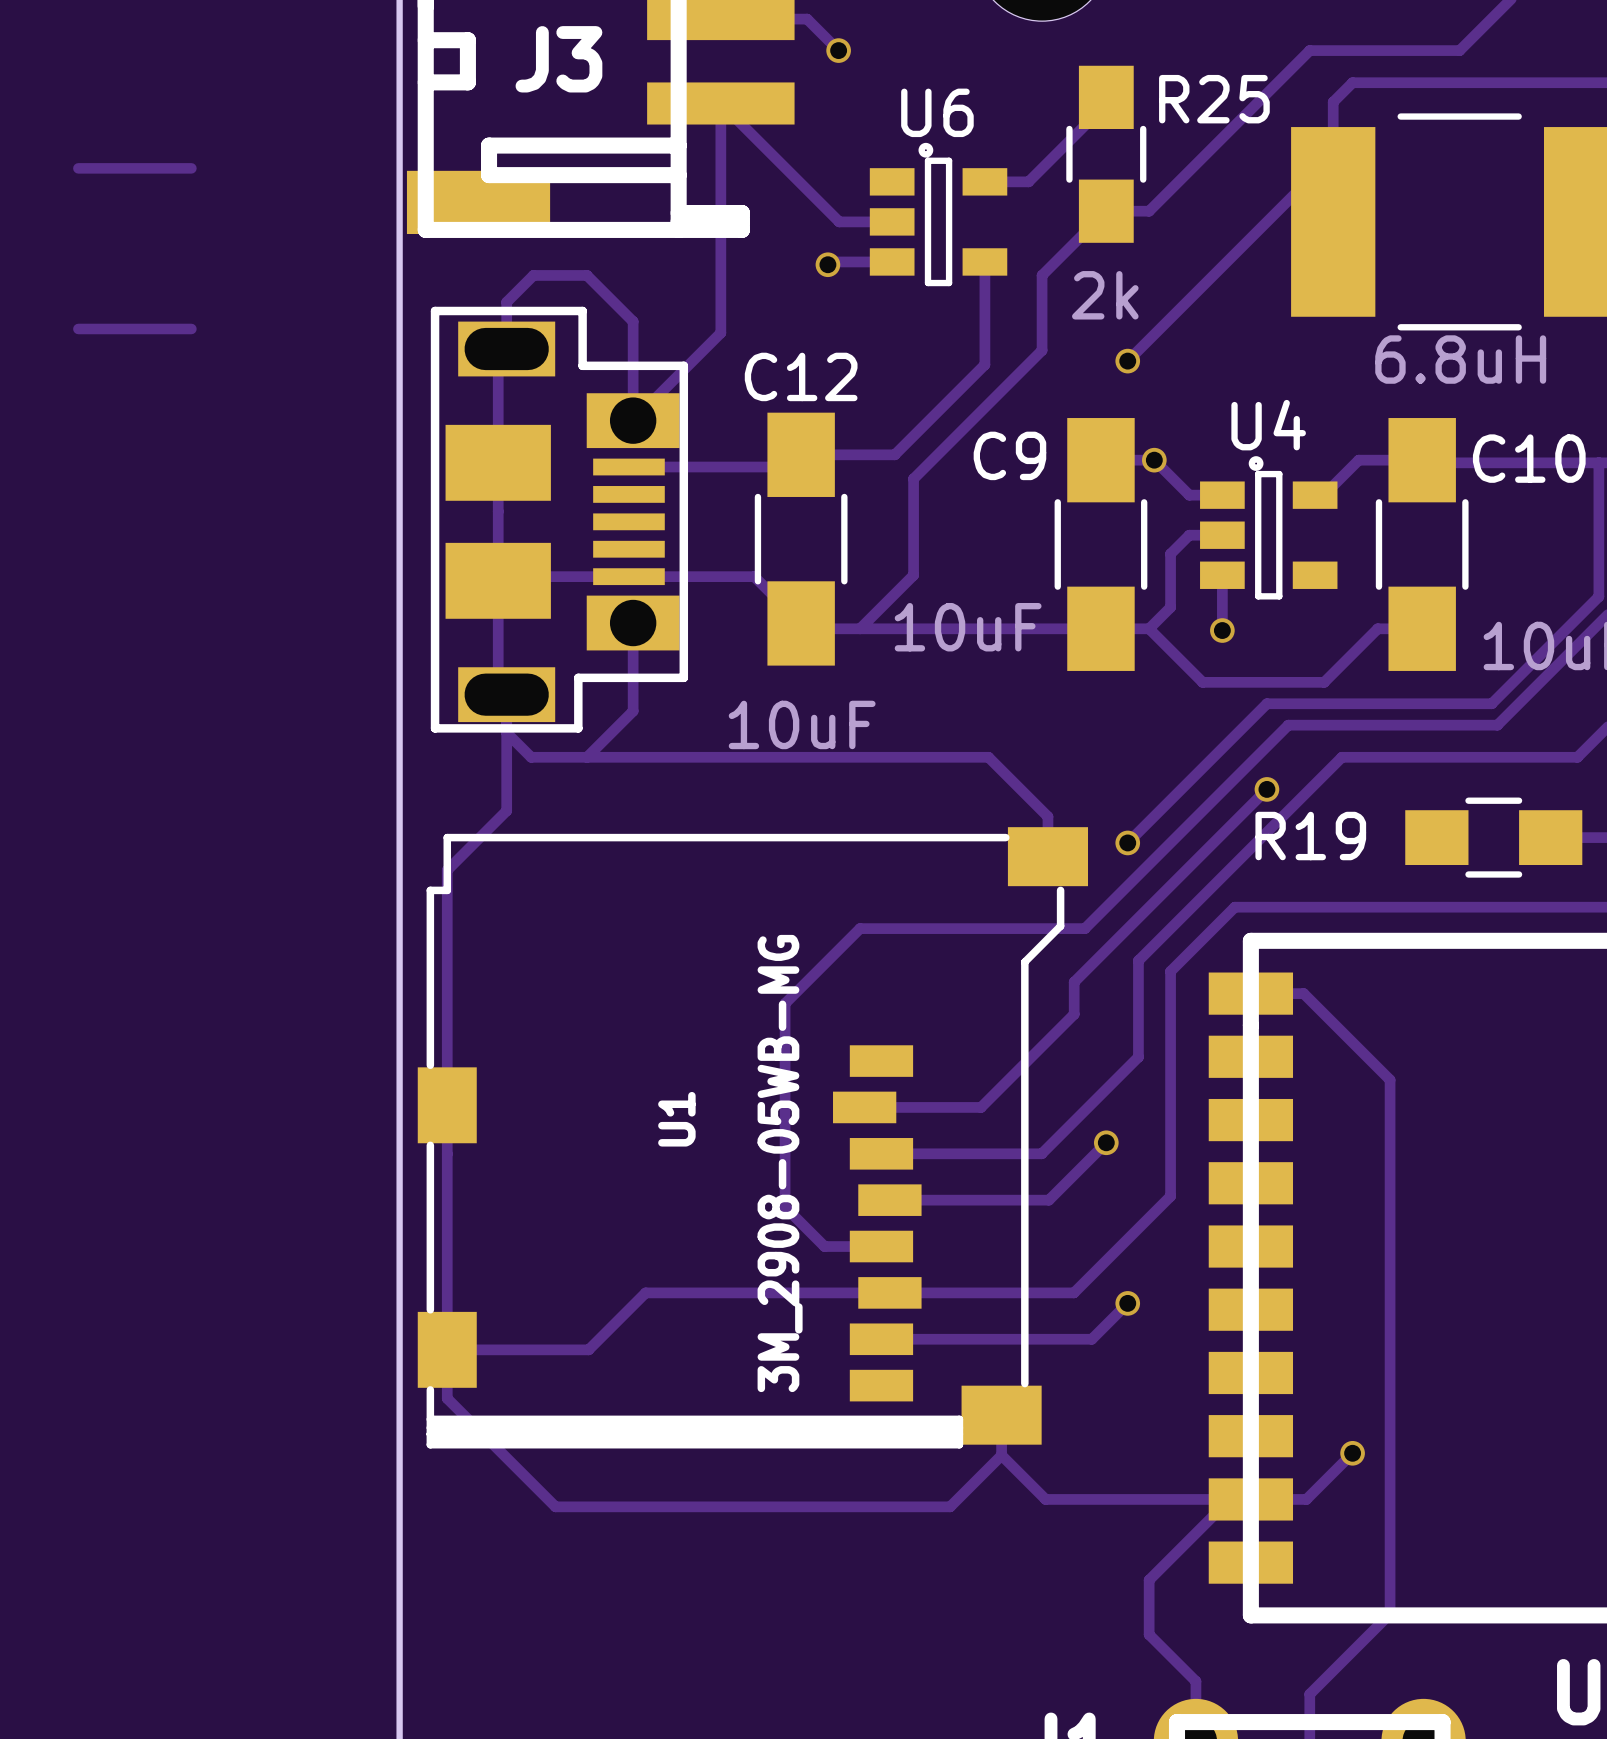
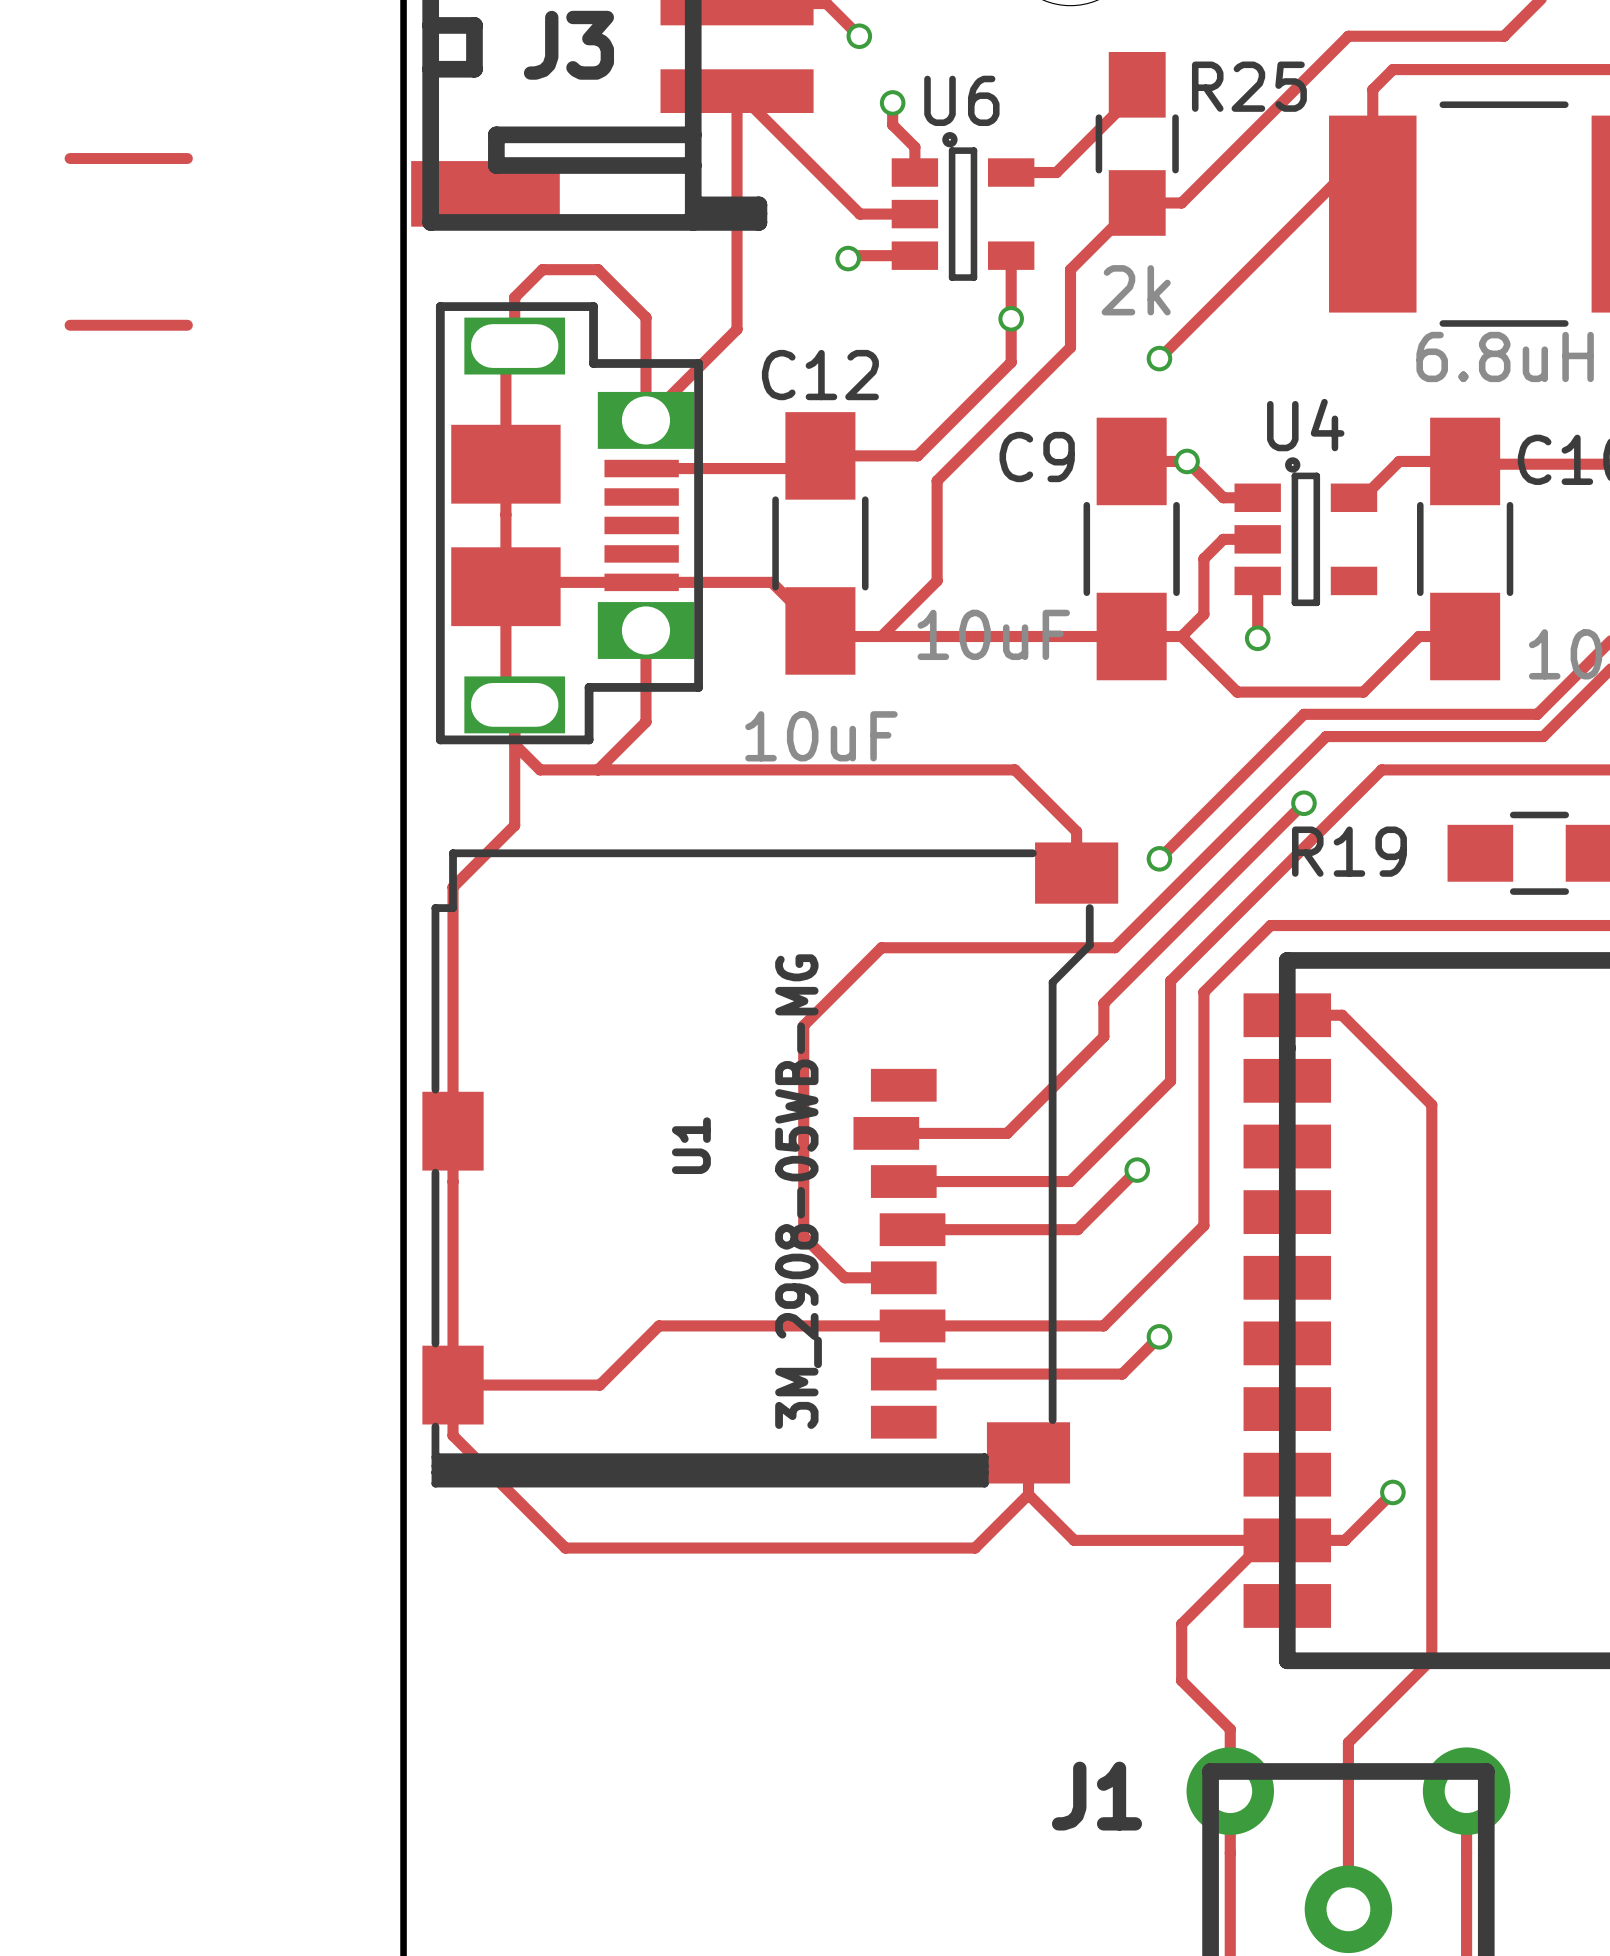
track: none -> (892, 102) (892, 124) (914, 147) (914, 172)
via: none -> (892, 102)
via: none -> (1011, 318)

